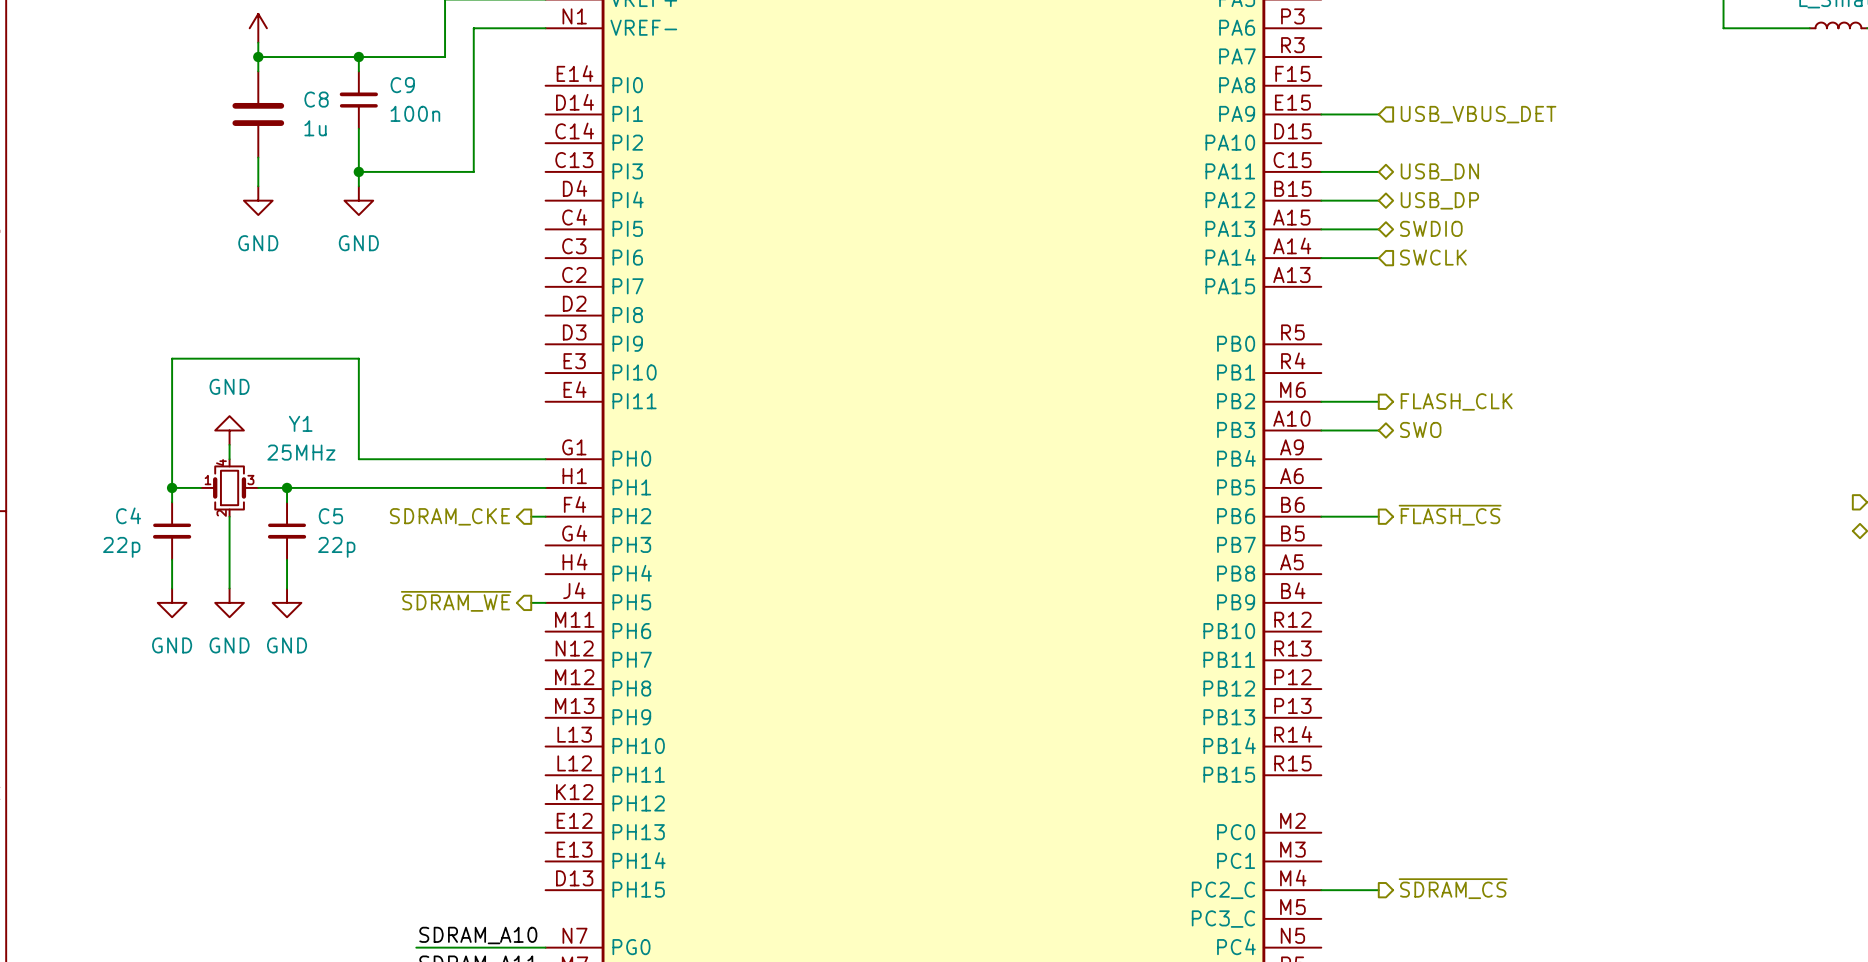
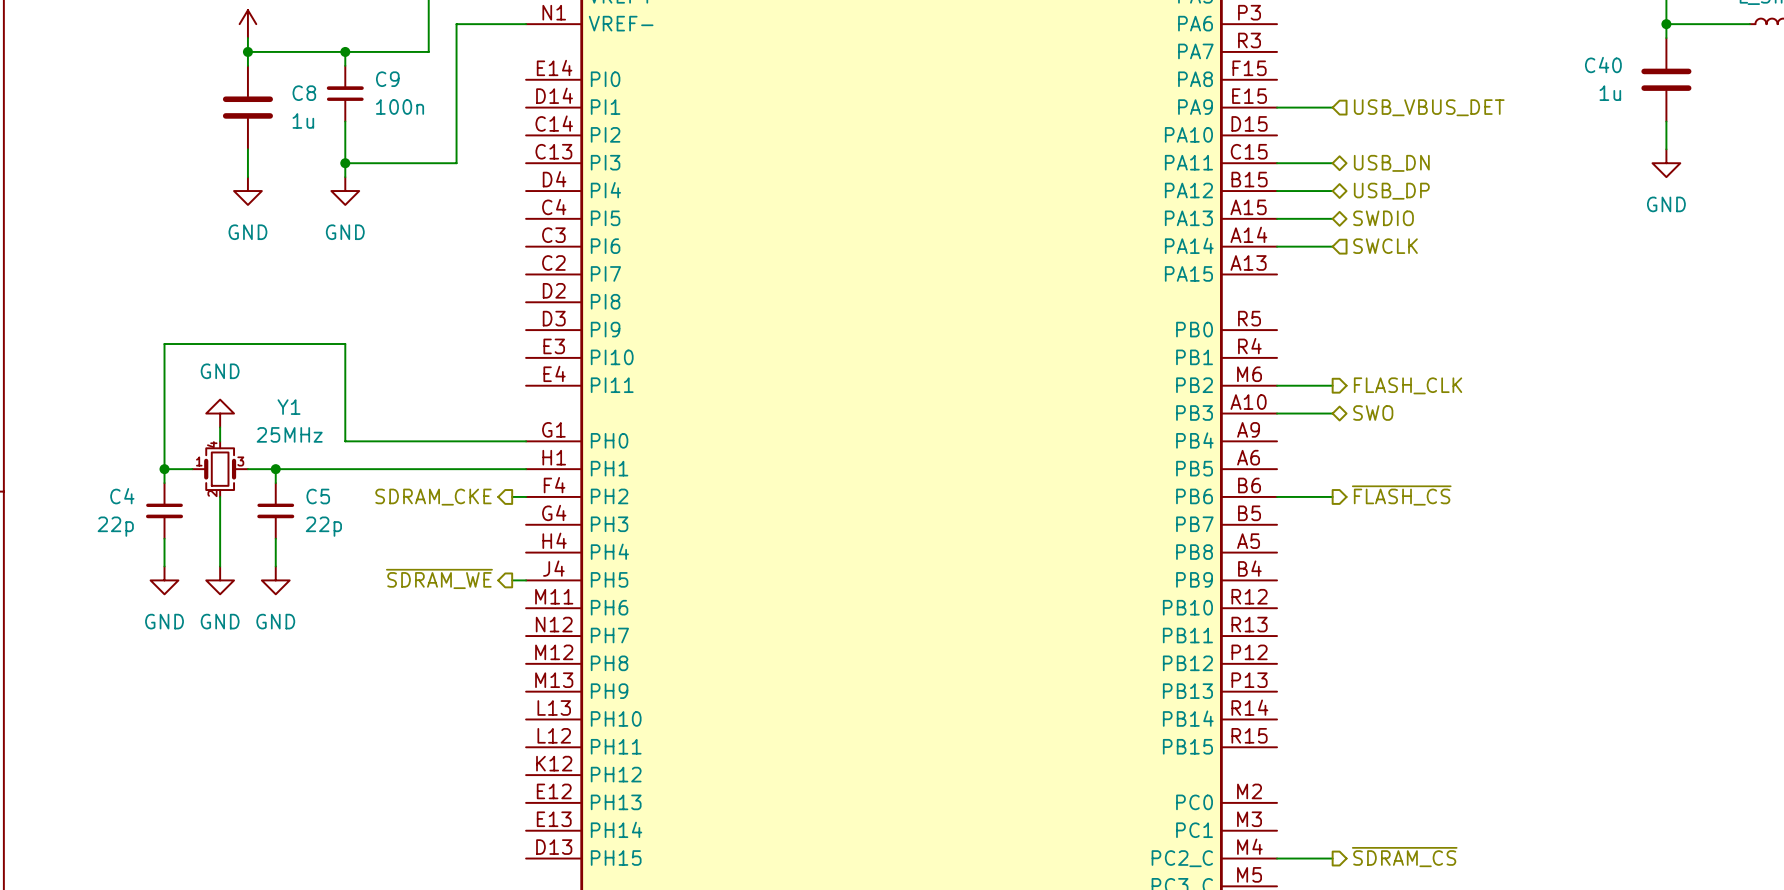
wire: none -> (1666, 24) (1666, 38)
junction: none -> (1666, 24)
C40: none -> 1u (1666, 79)
wire: none -> (1666, 121) (1666, 149)
power symbol: none -> GND (1666, 163)

